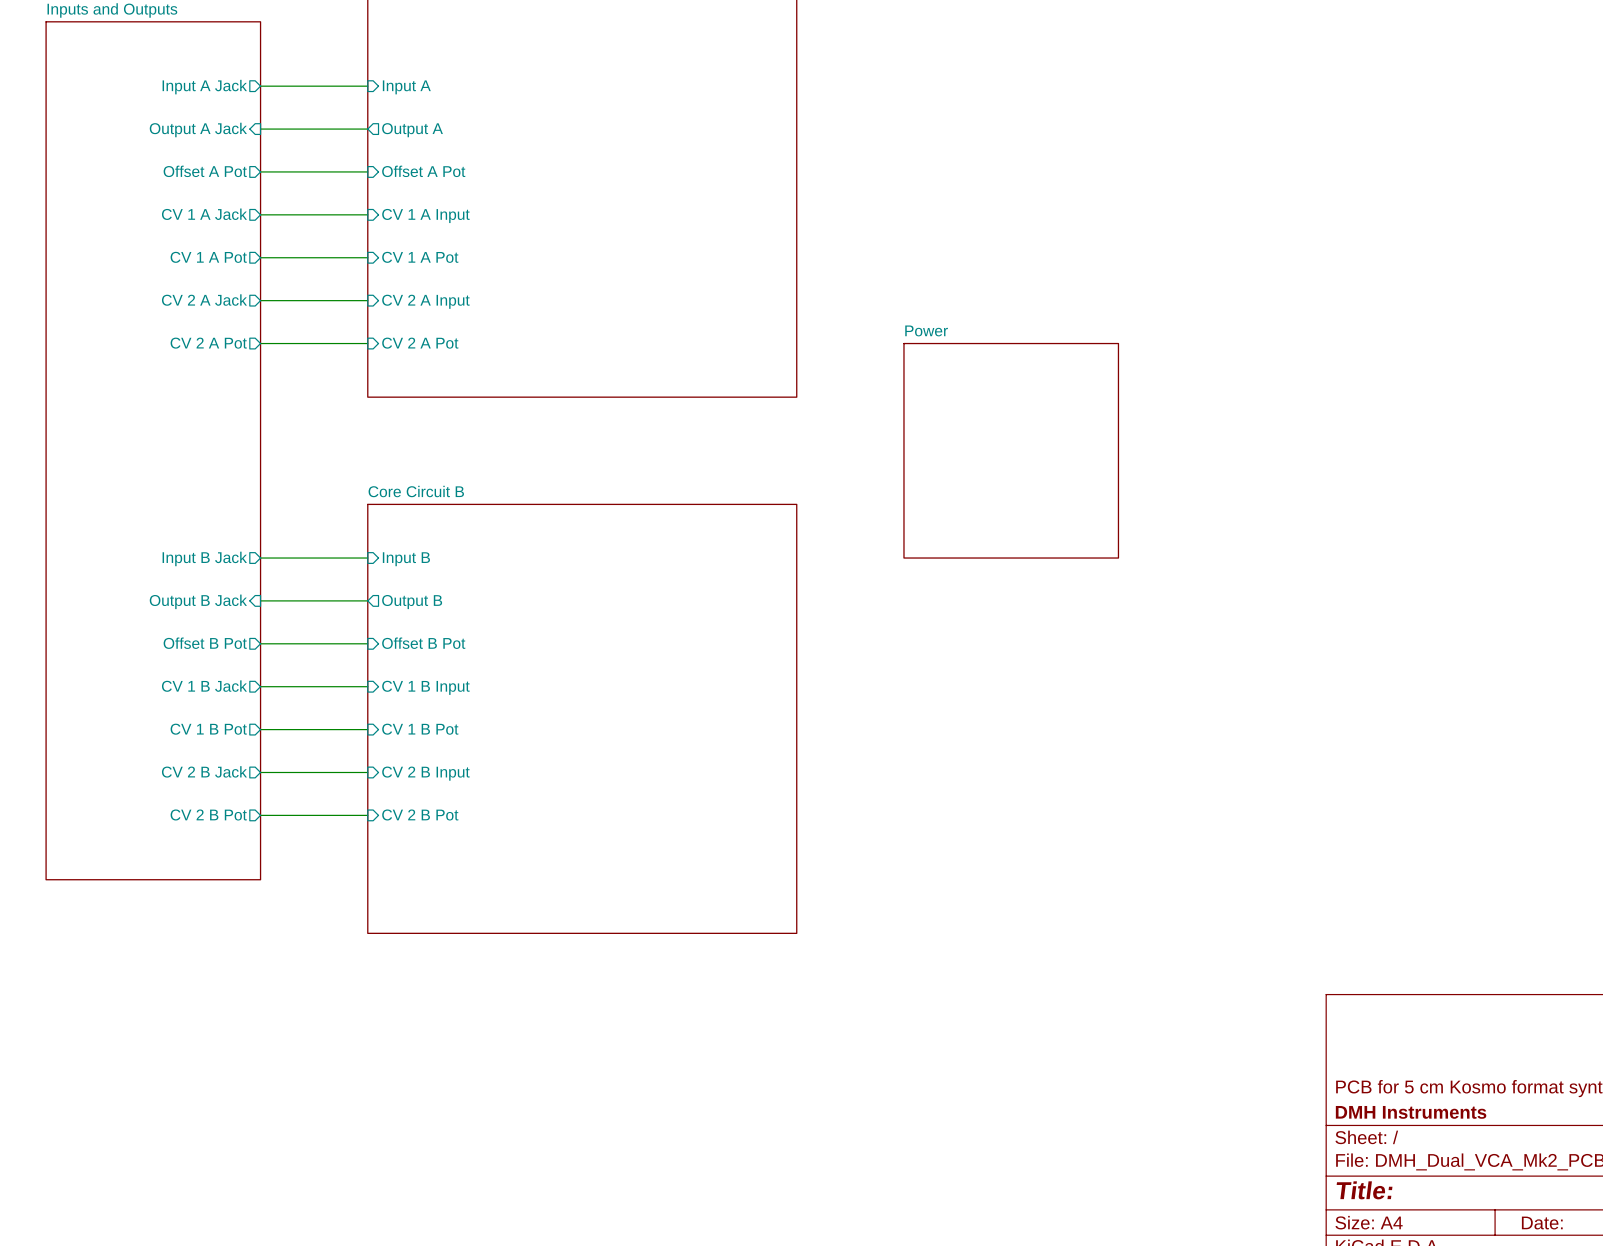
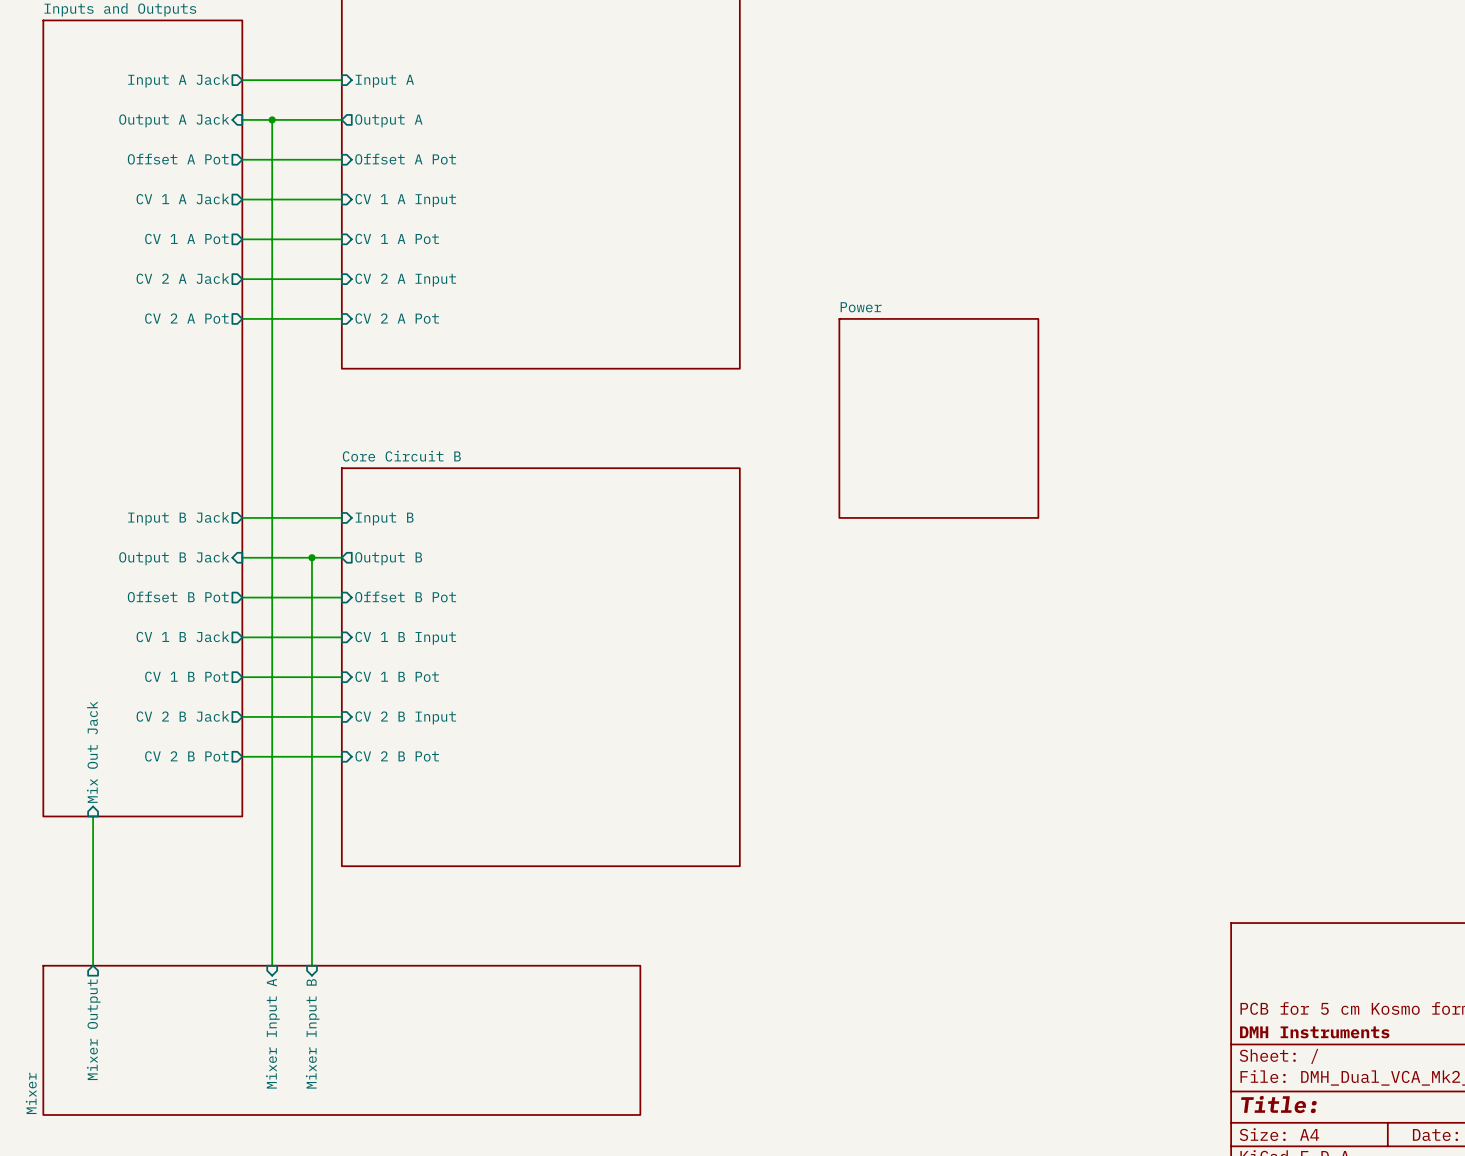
wire: none -> (272, 119) (272, 965)
junction: none -> (272, 119)
wire: none -> (311, 557) (311, 965)
junction: none -> (311, 557)
sheet pin: none -> Mix Out Jack (92, 752)
wire: none -> (93, 816) (93, 965)
sheet pin: none -> Mixer Output (93, 1029)
sheet pin: none -> Mixer Input A (272, 1033)
sheet pin: none -> Mixer Input B (312, 1033)
sheet Mixer: none -> (341, 1040)

